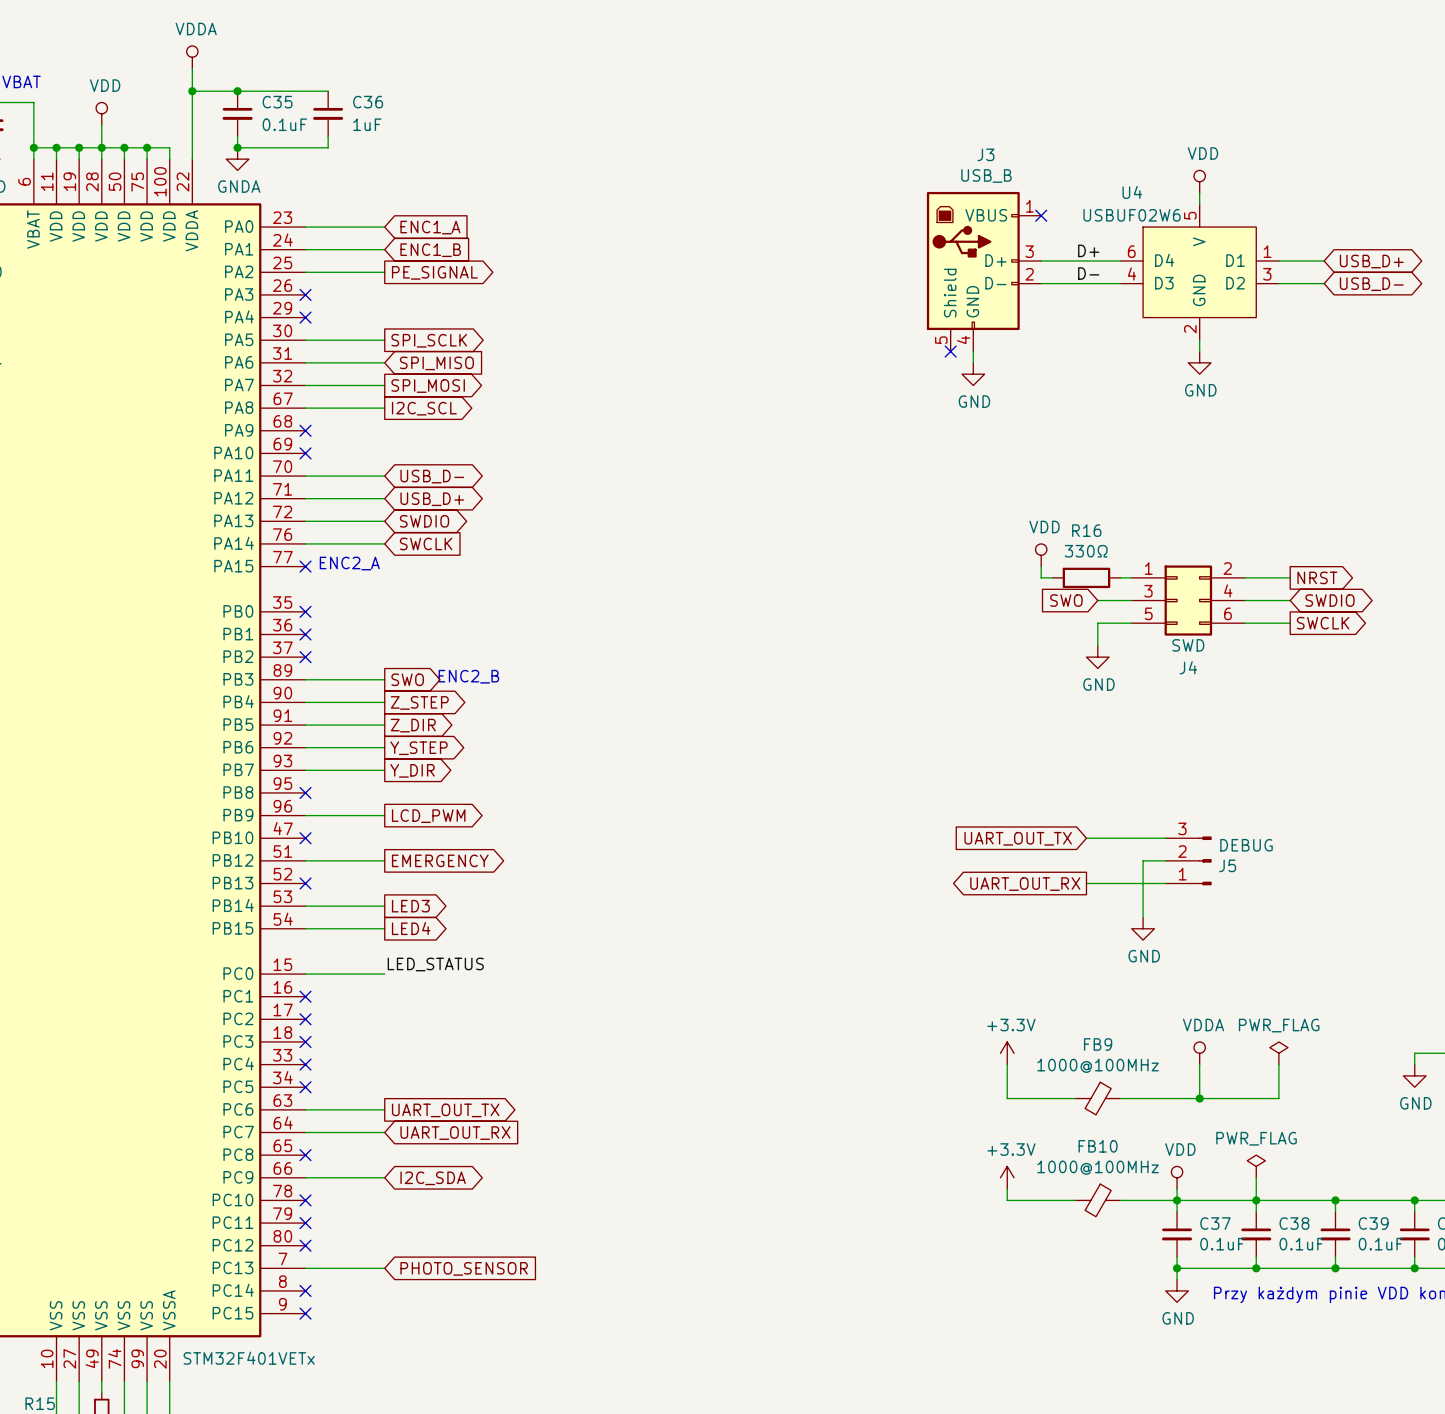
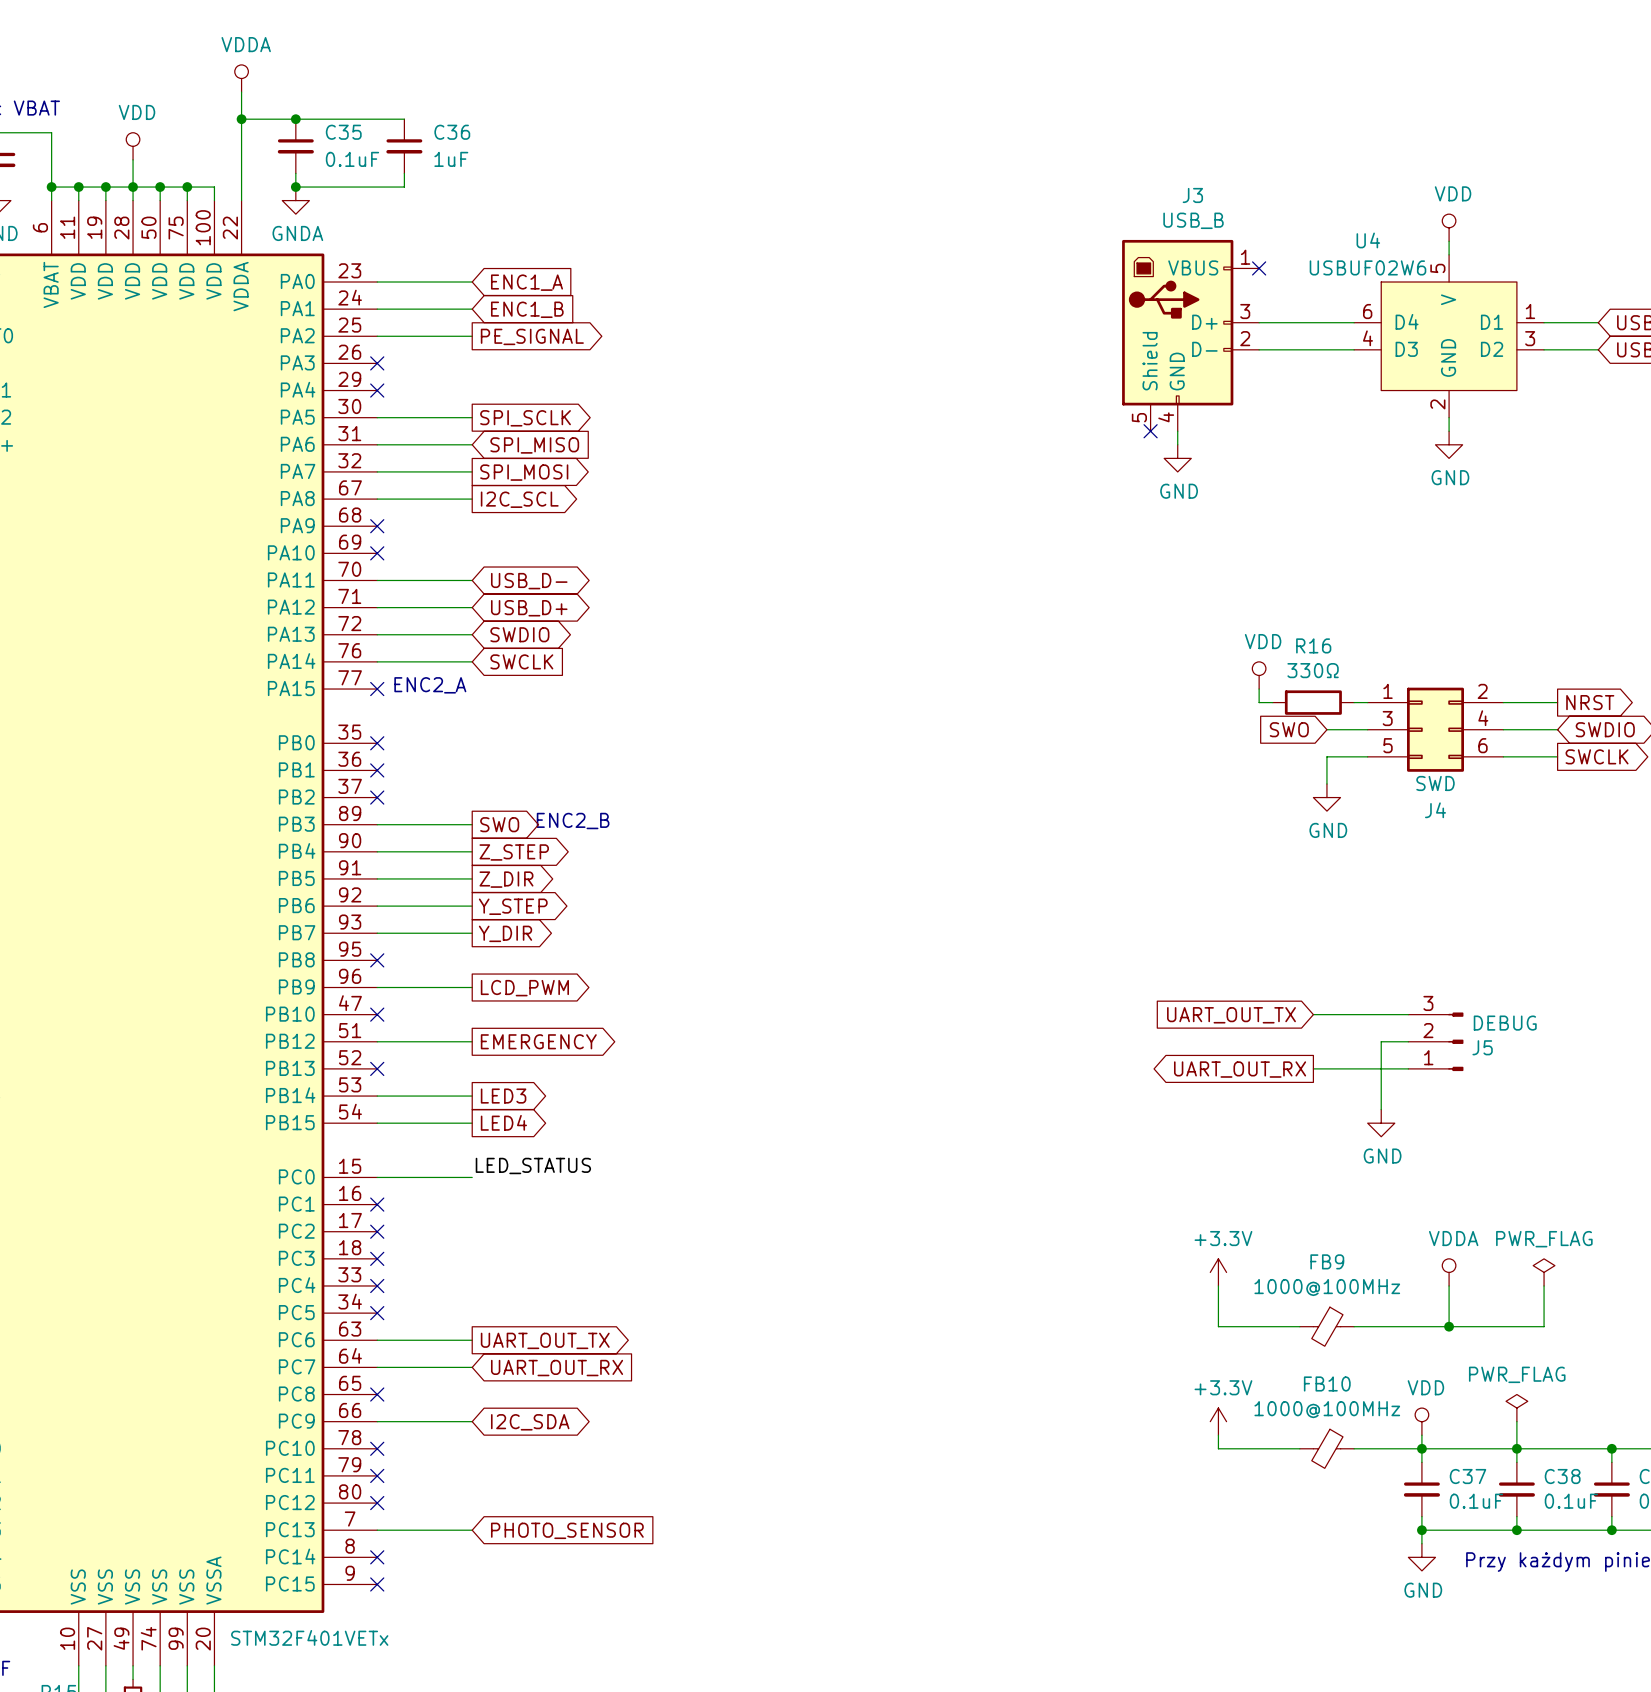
label: D+ (1088, 250) -> none
label: D- (1088, 273) -> none

